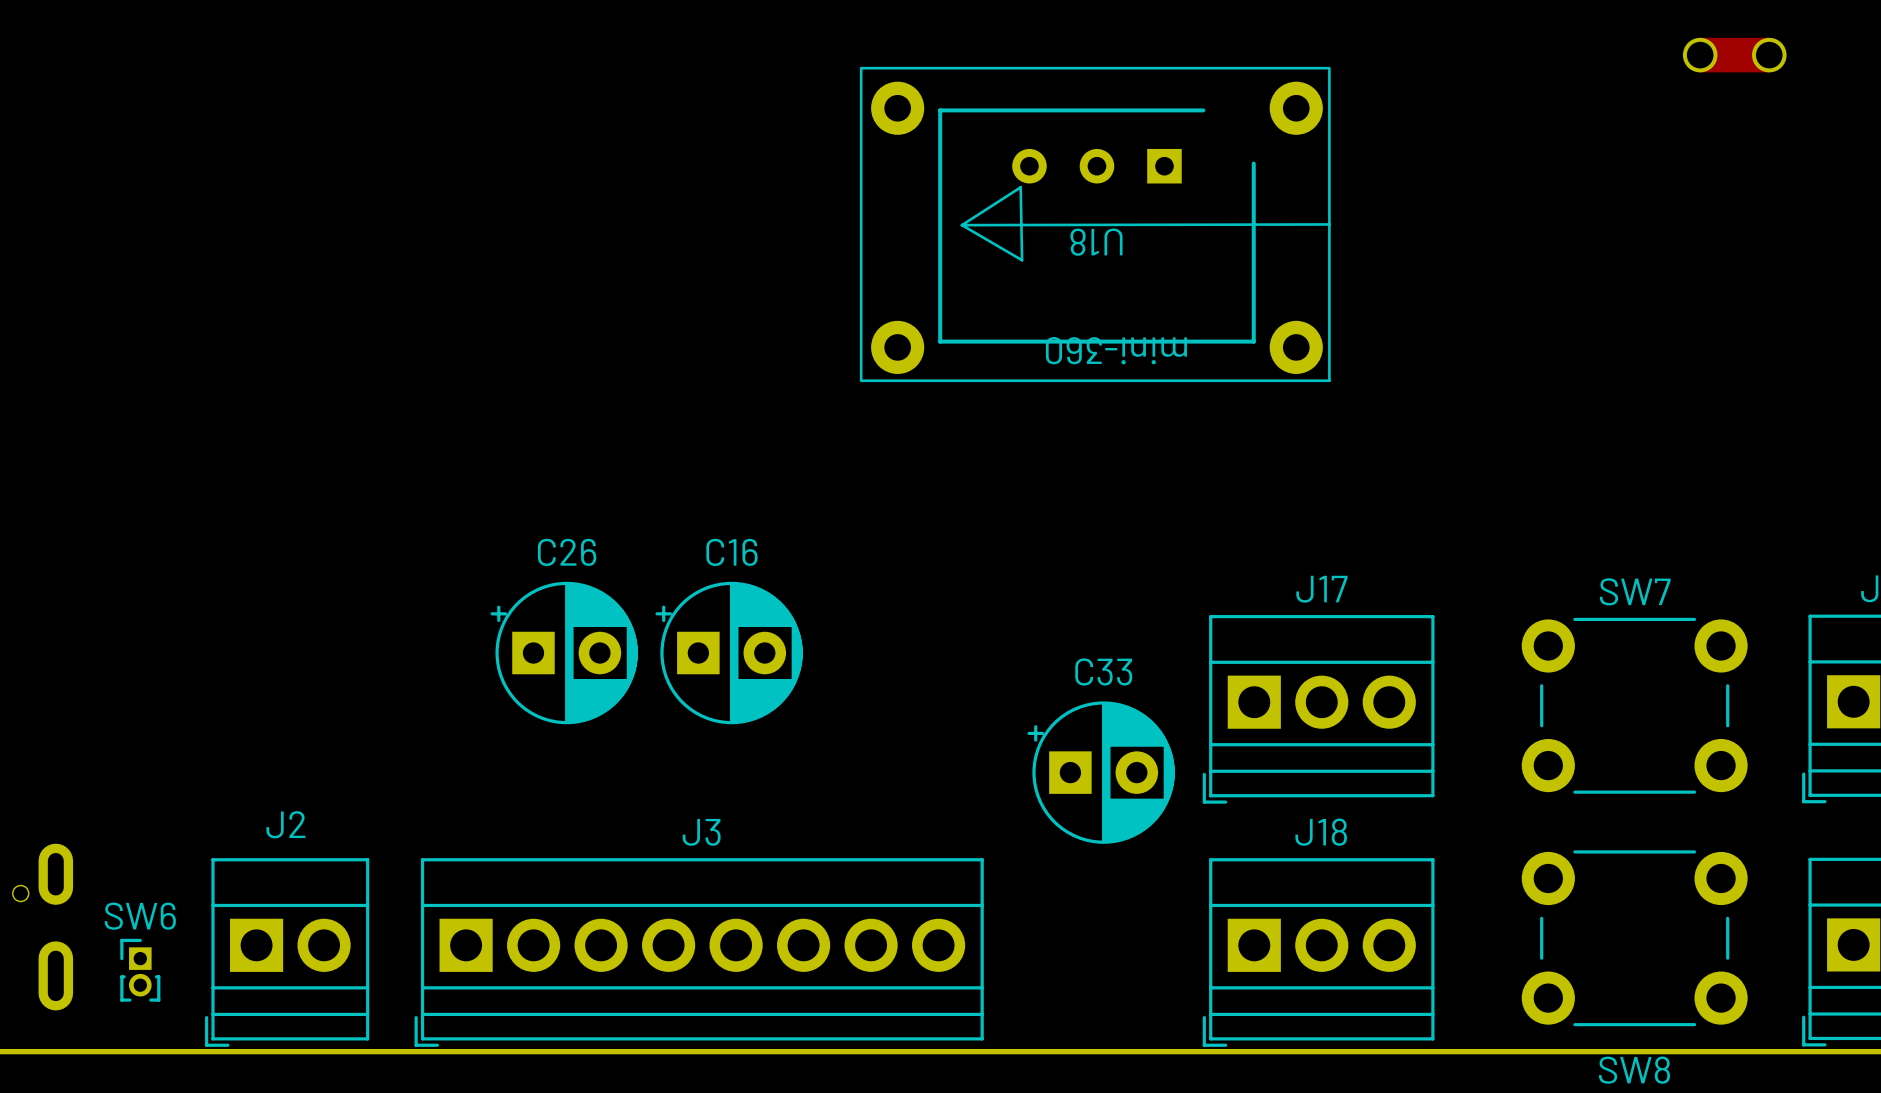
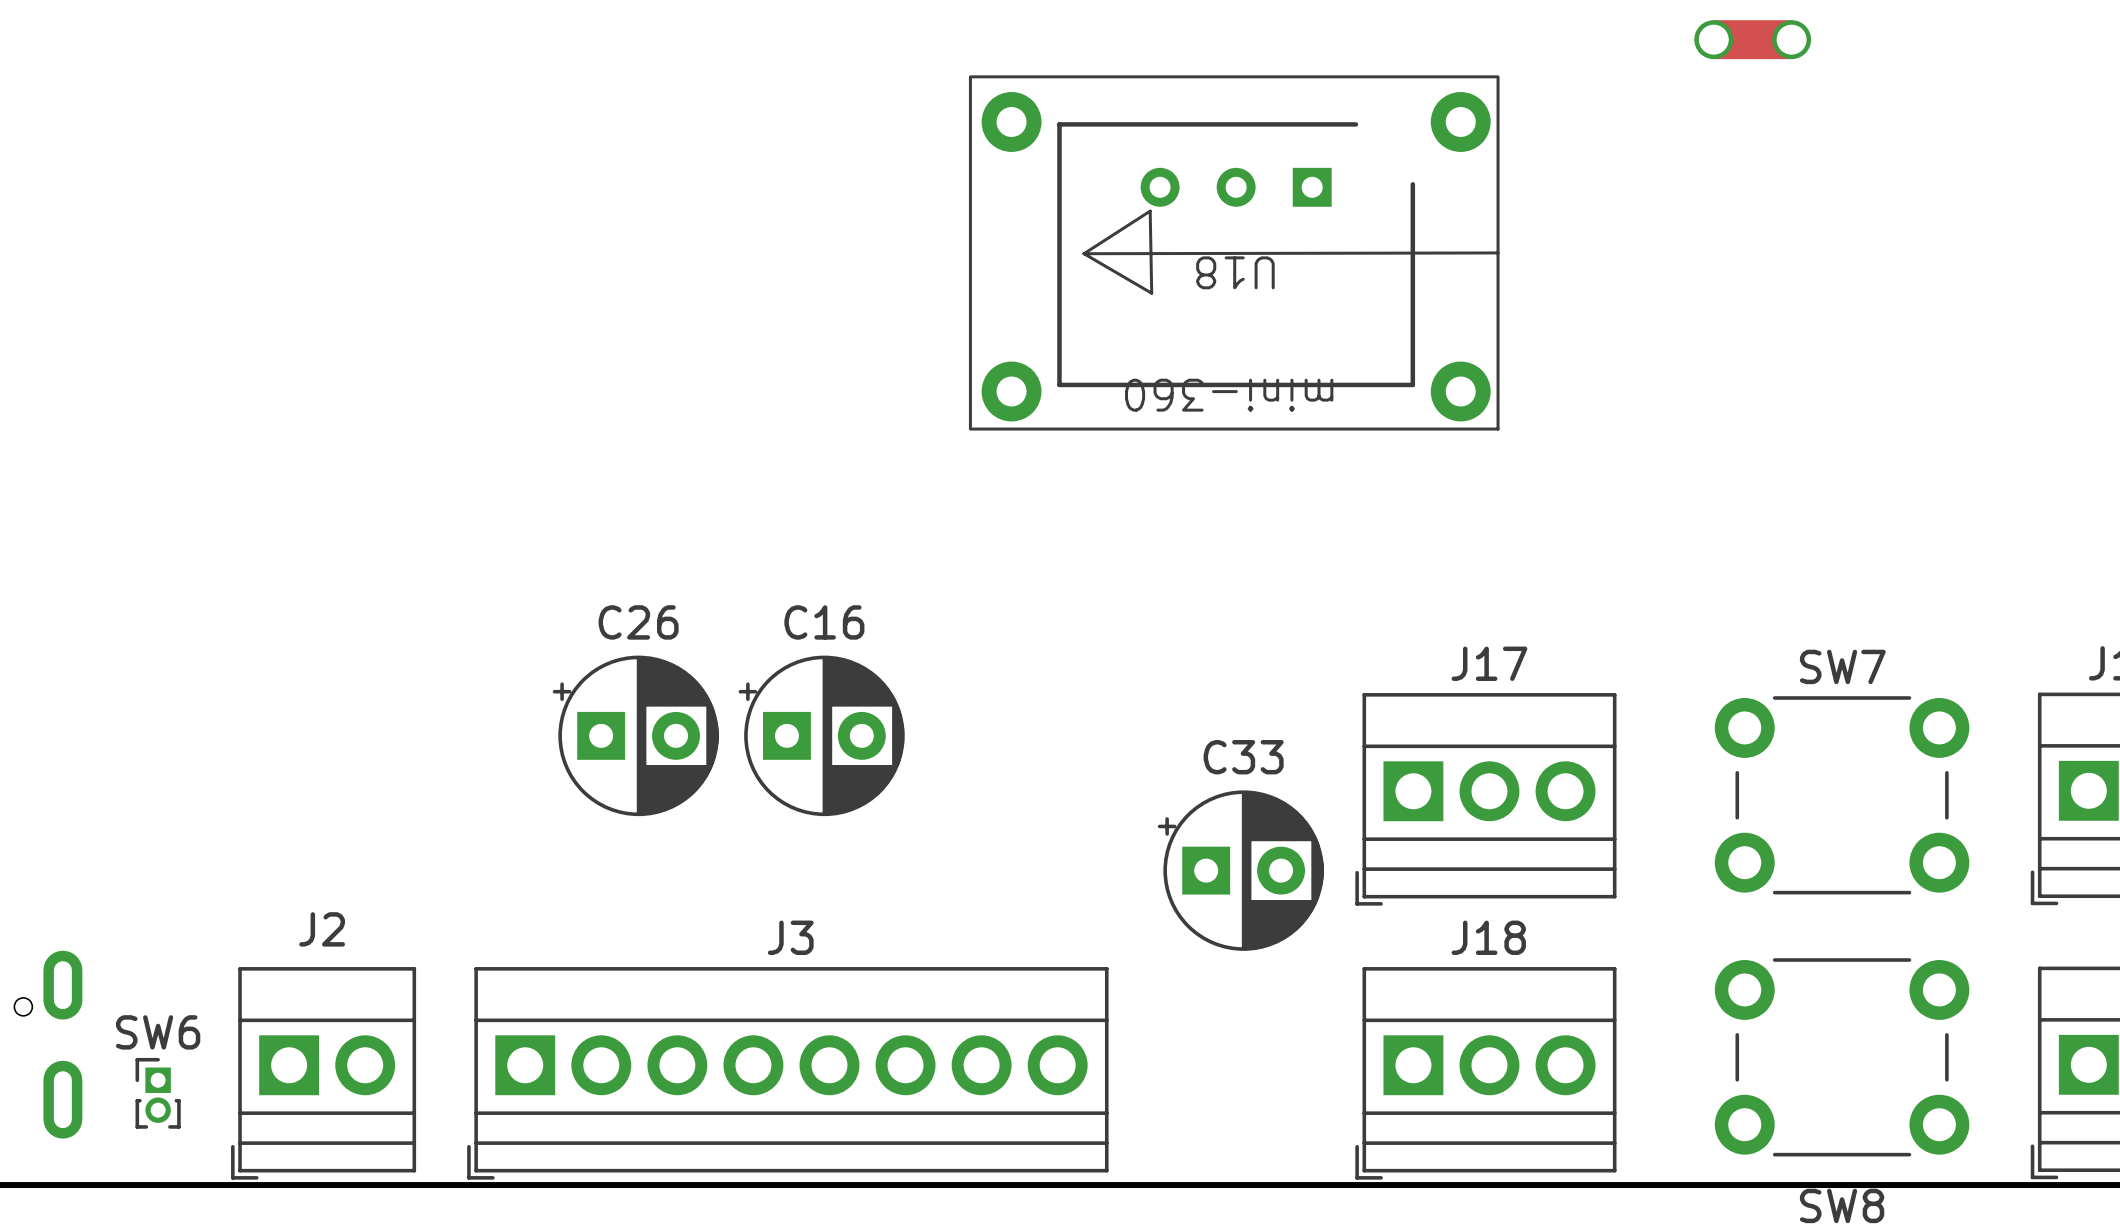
part position: (1734, 55) -> (1752, 39)

